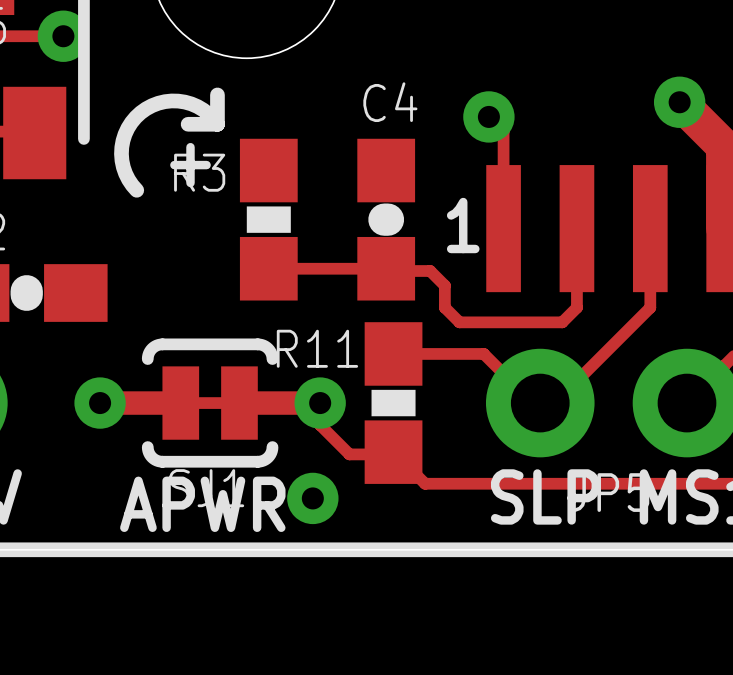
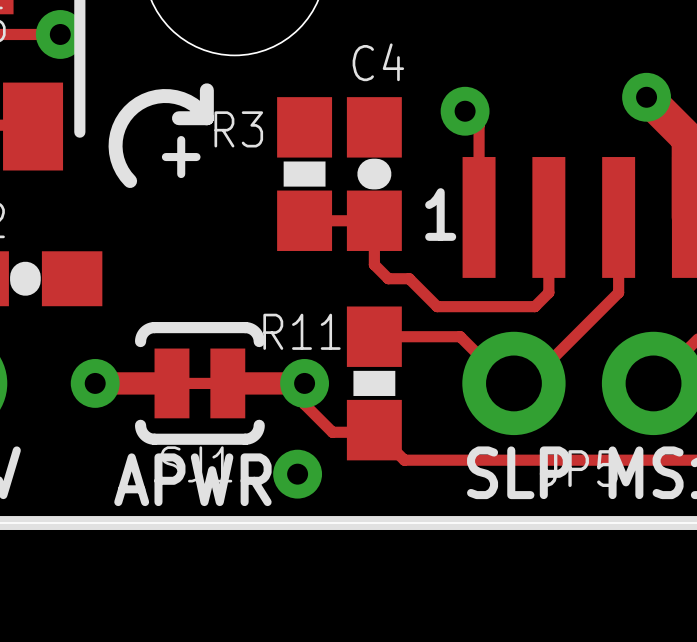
R3 position: (268, 219) -> (304, 174)
C4 position: (386, 219) -> (374, 174)
track: (268, 268) (386, 268) (388, 271) (430, 271) (444, 285) (444, 307) -> (304, 220) (374, 220) (374, 264) (388, 278) (409, 278) (423, 292)

